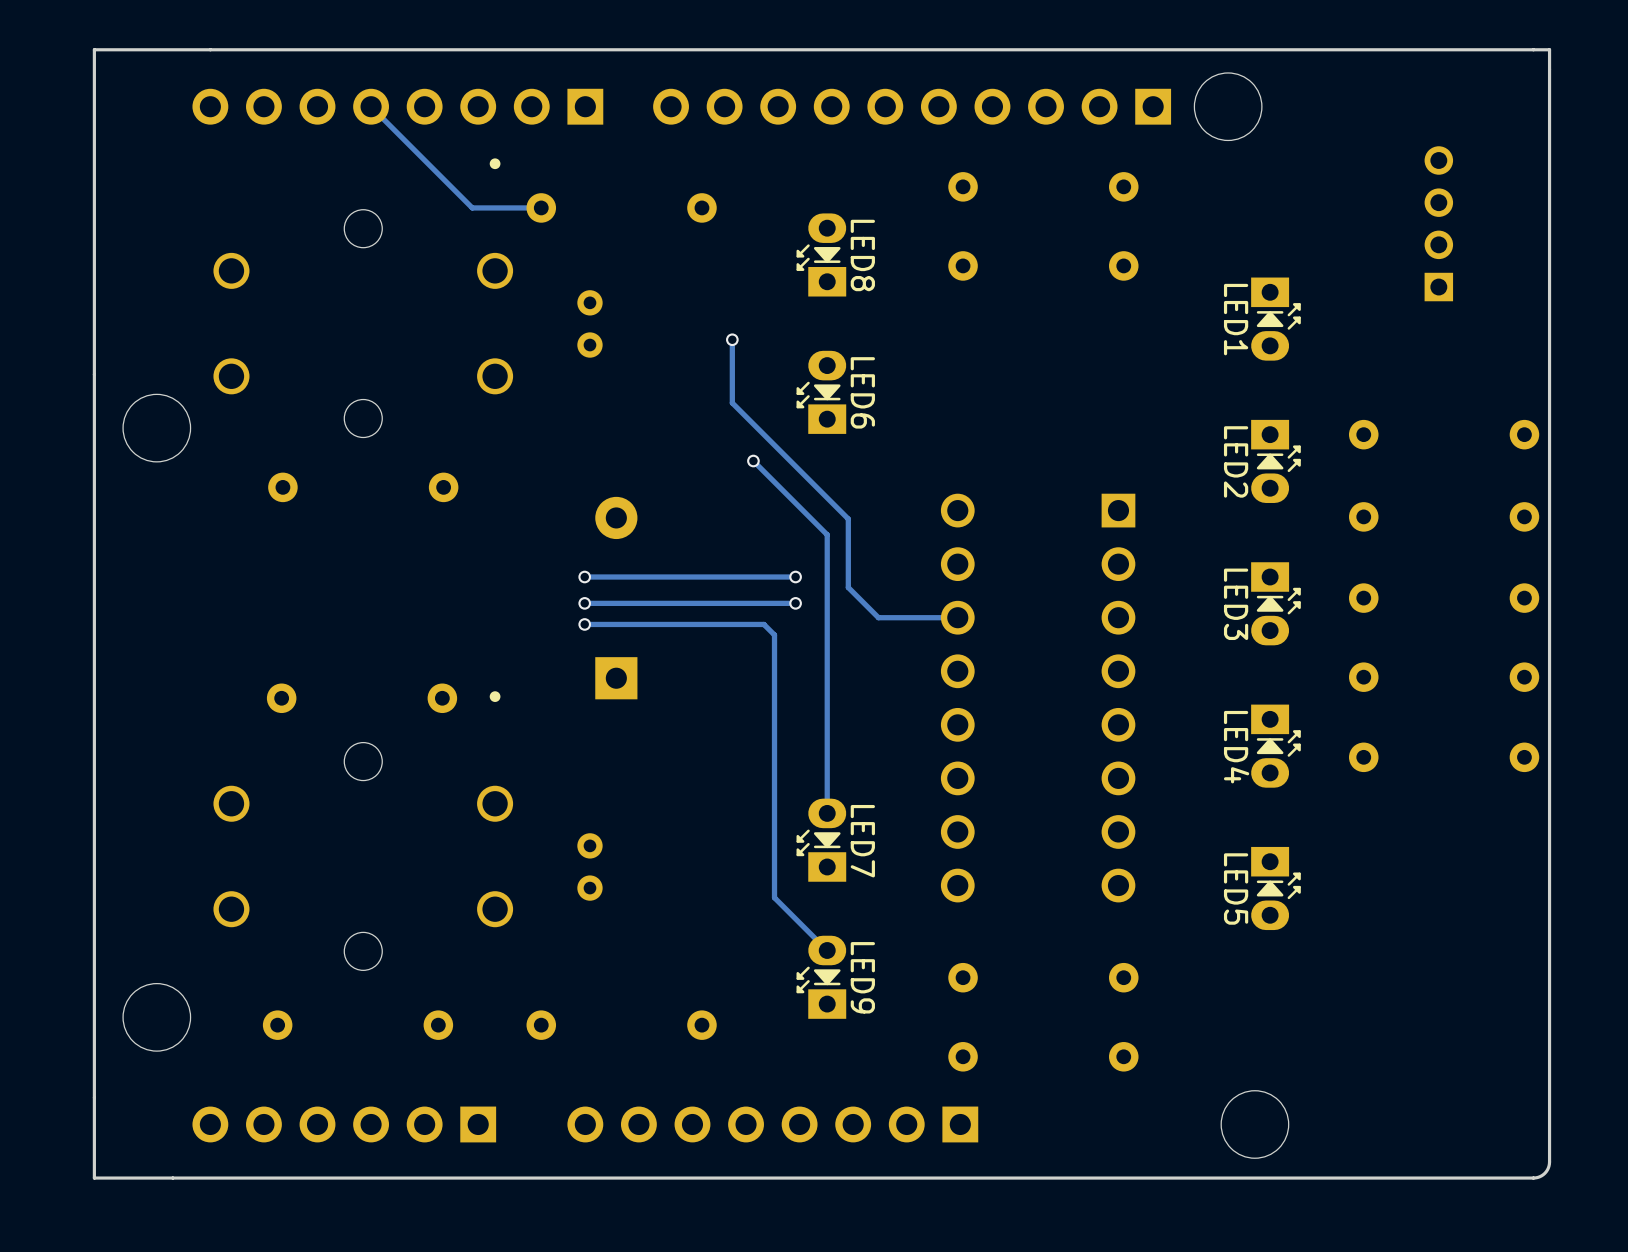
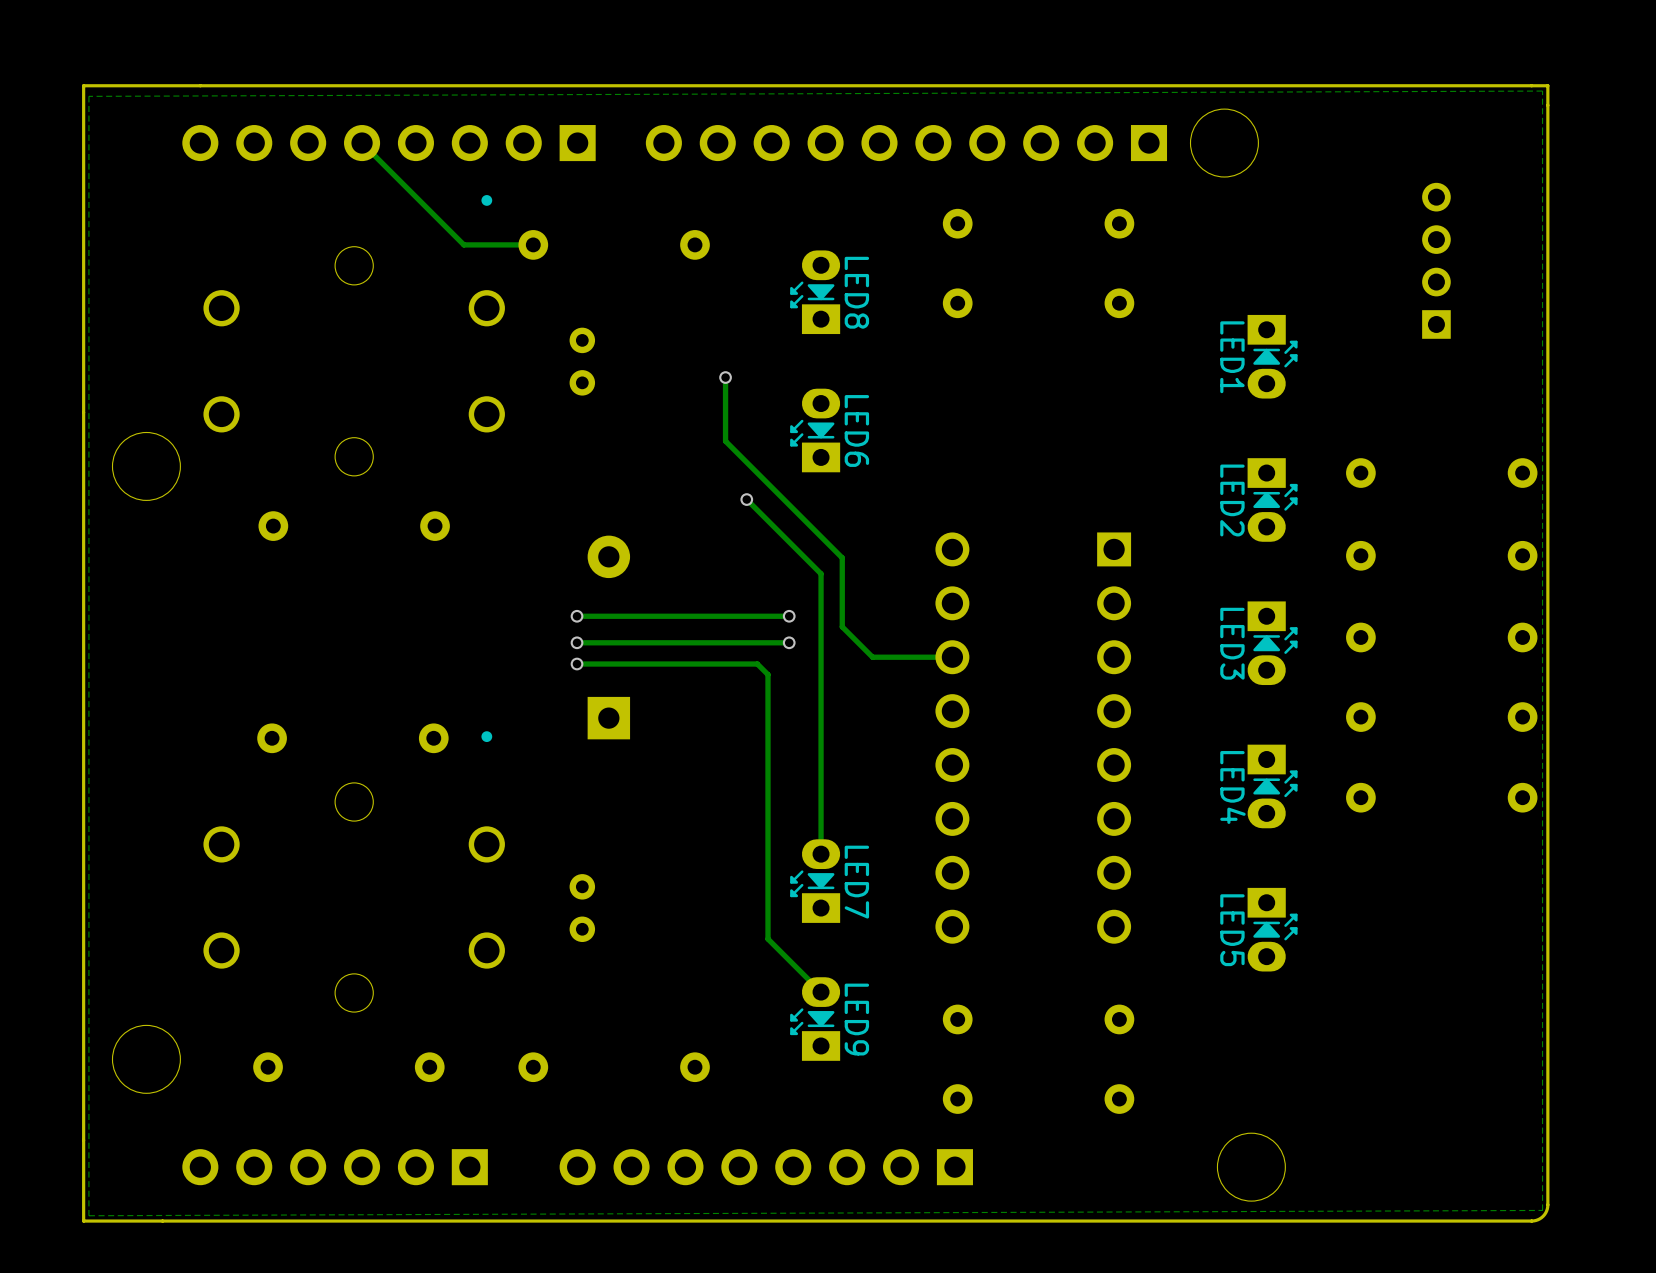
zone outline: none -> (1542, 91) (88, 96) (88, 1215) (1542, 1210) (1542, 91)

